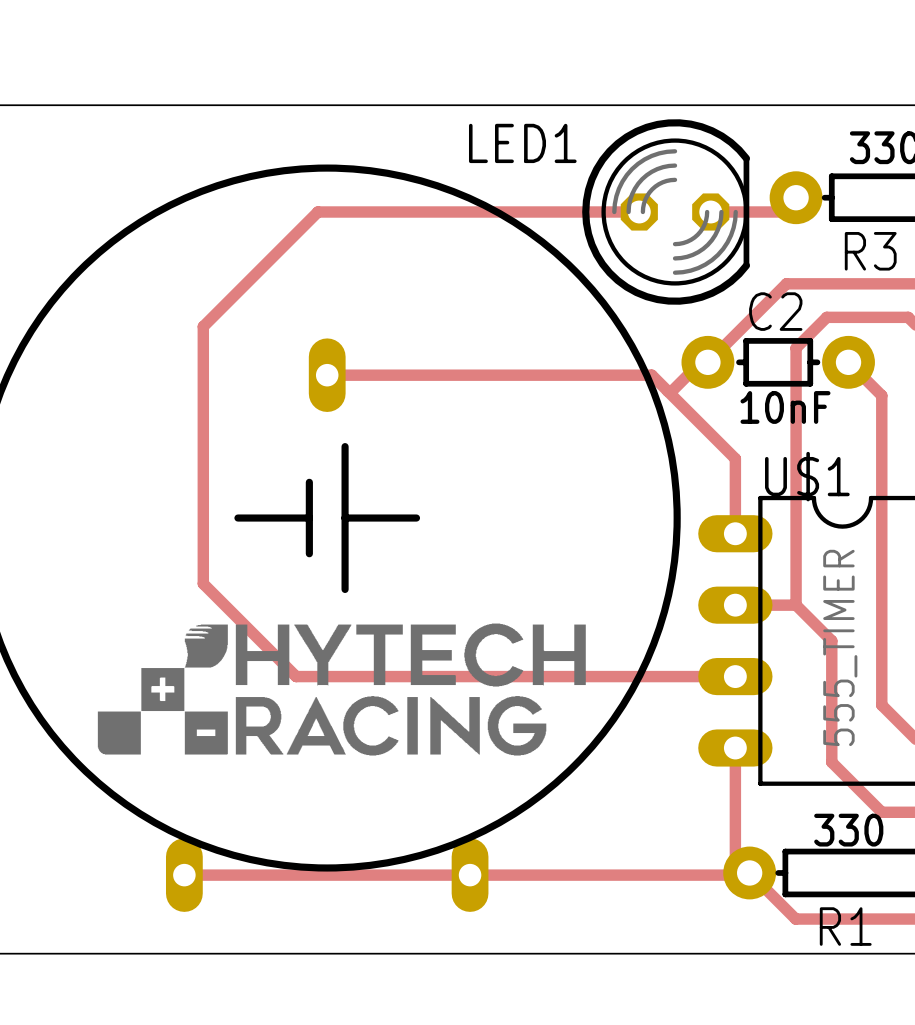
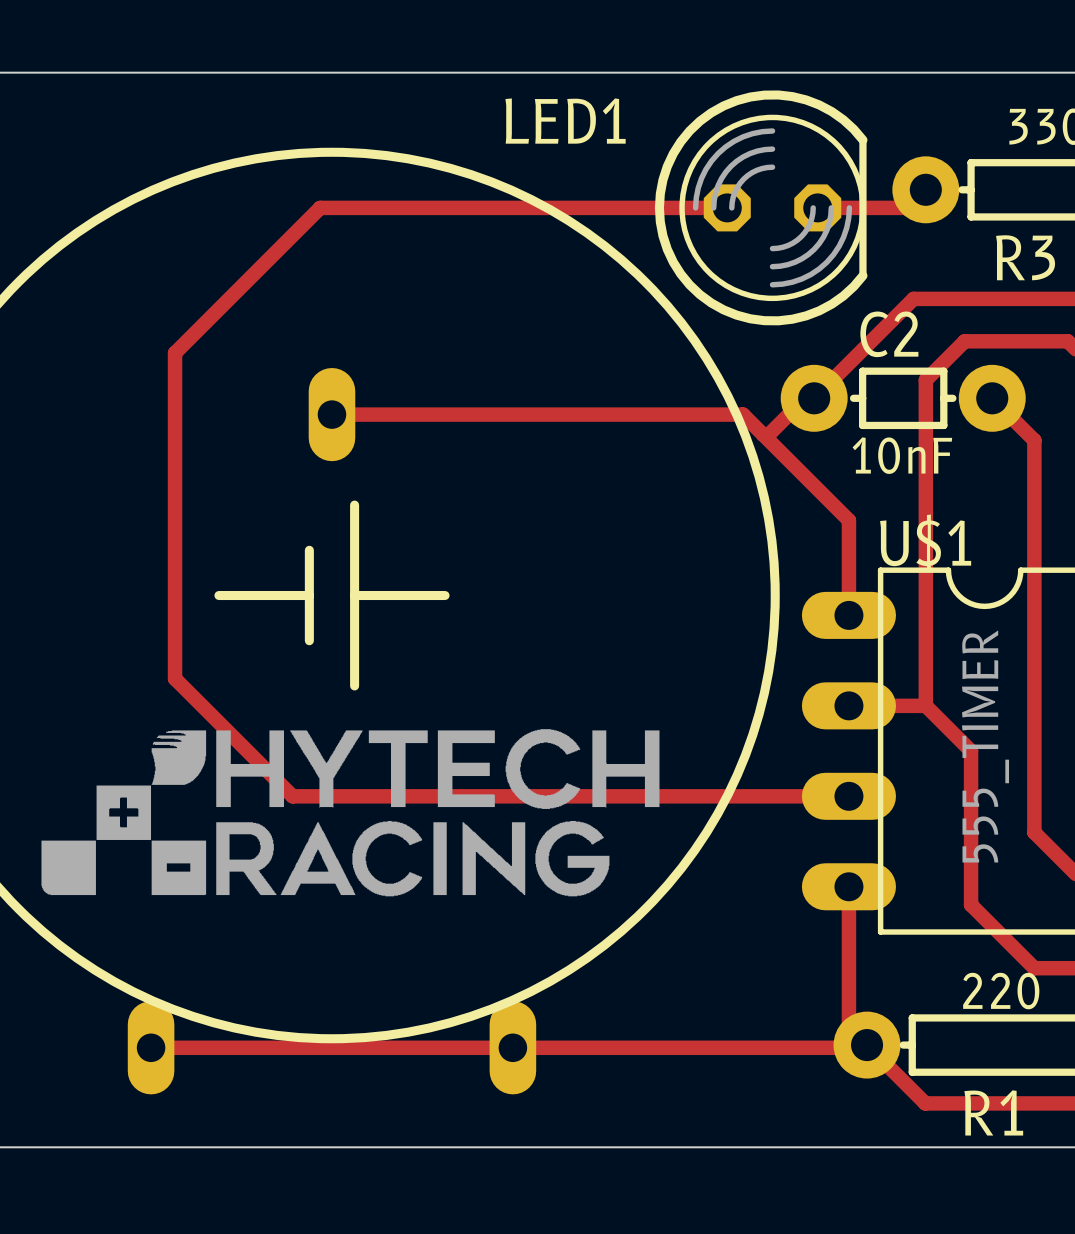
R1 value: 330 (848, 830) -> 220 (1001, 991)

